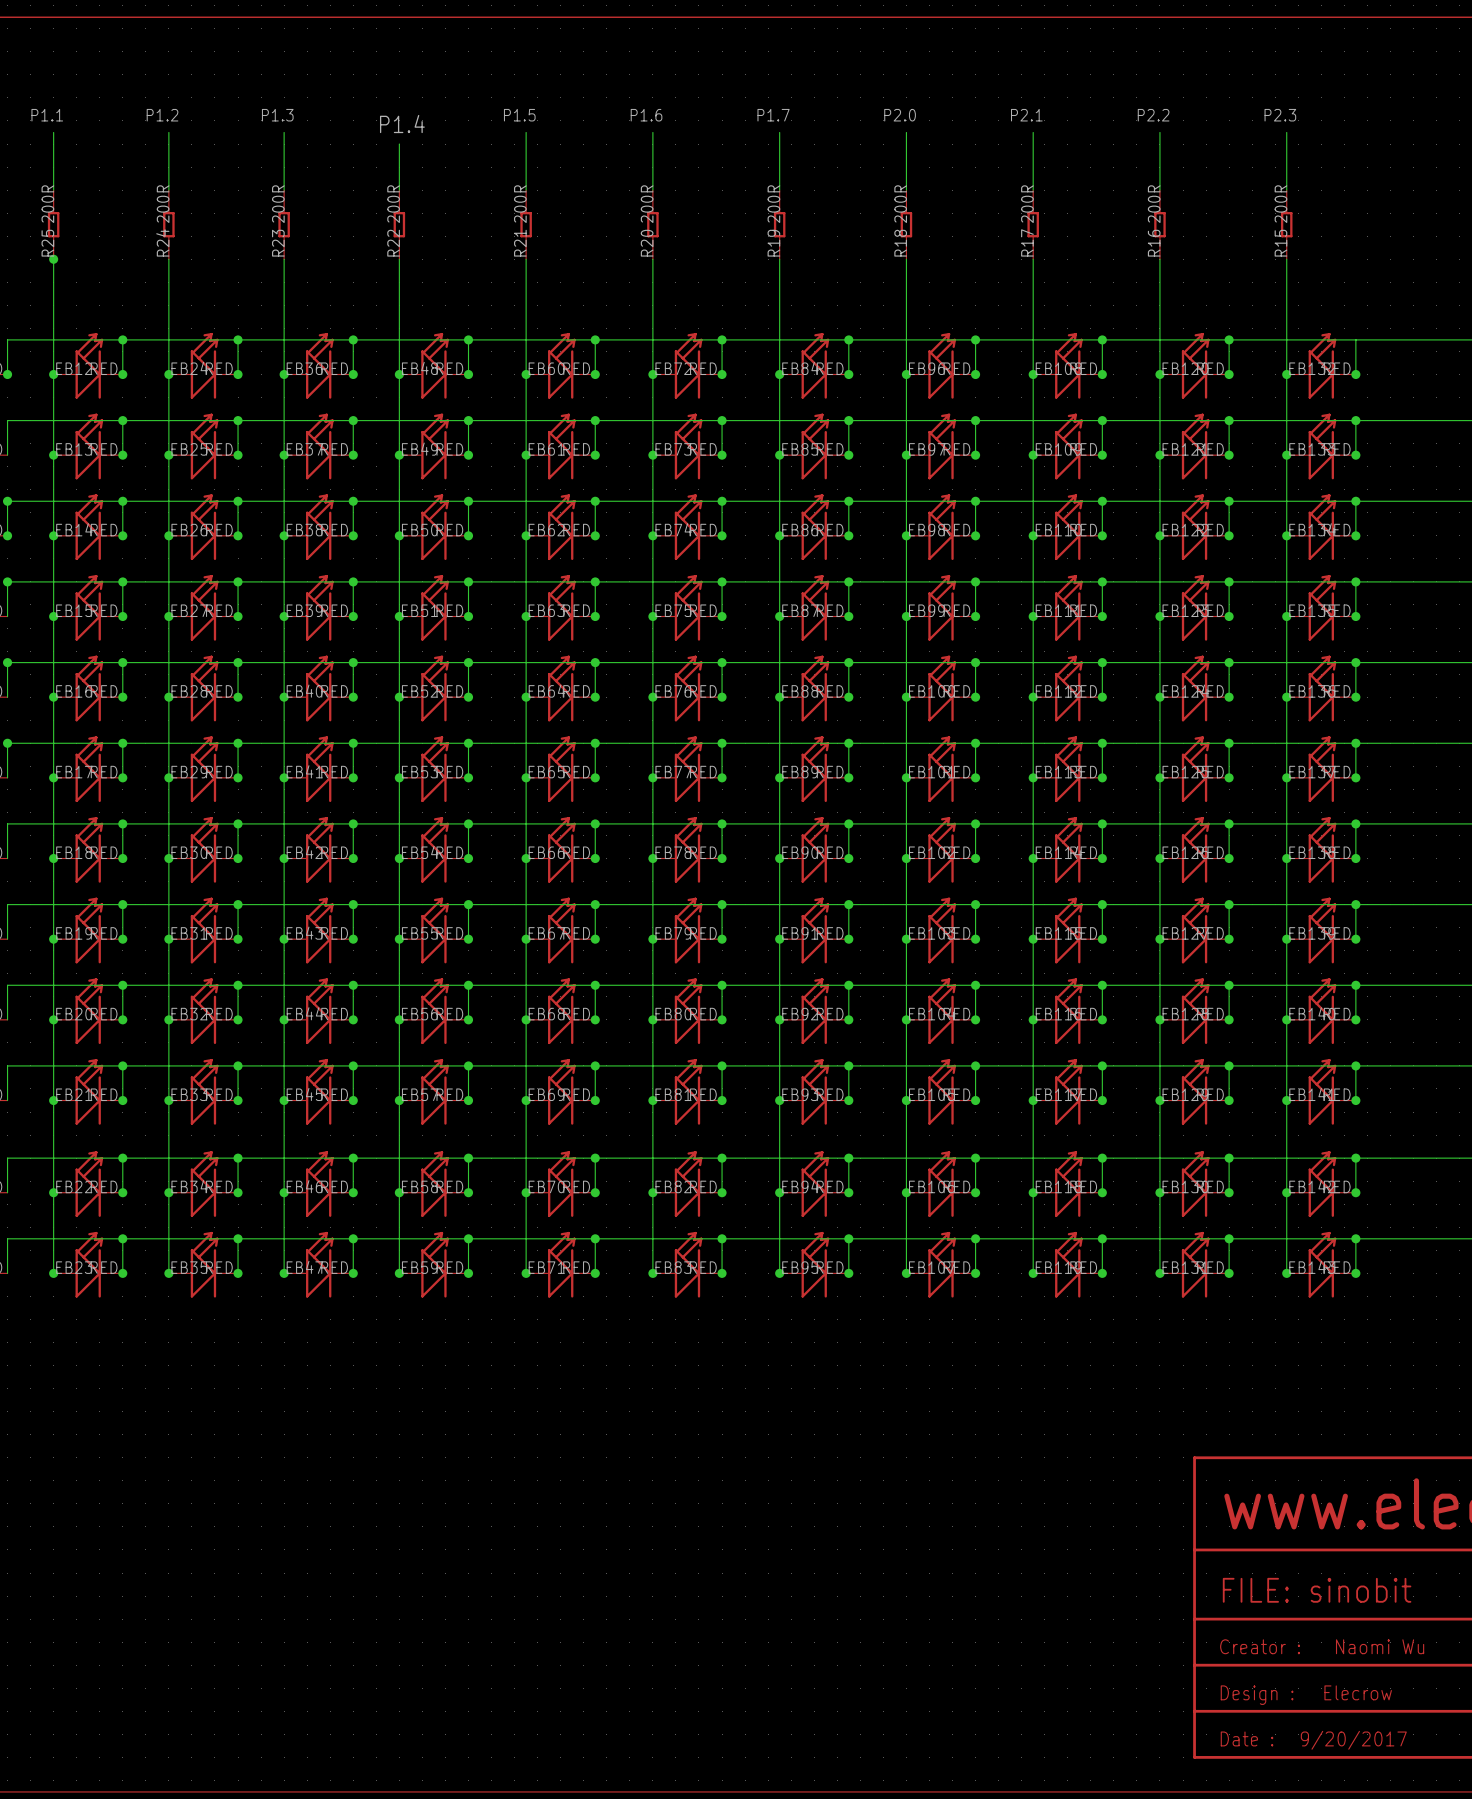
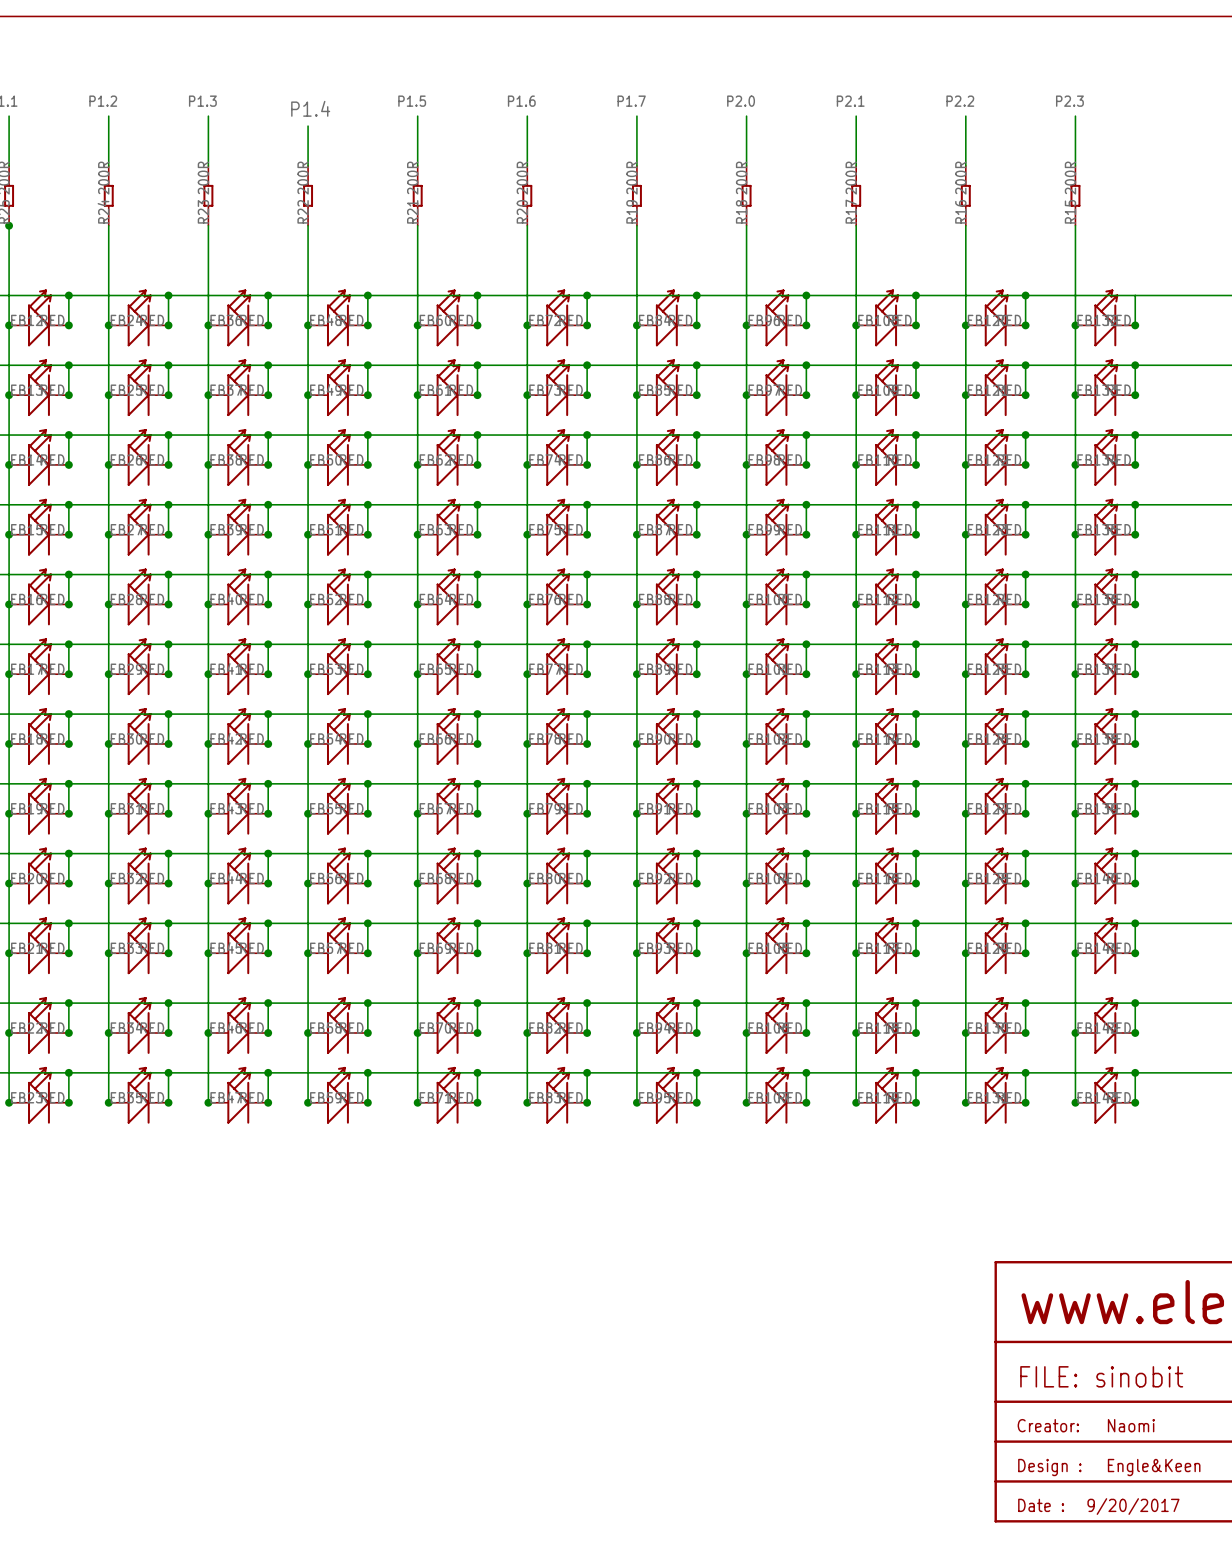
text: Creator : (1260, 1646) -> Creator: (1048, 1425)
text: Naomi Wu (1380, 1646) -> Naomi (1131, 1425)
text: Elecrow (1358, 1692) -> Engle&Keen (1154, 1467)

